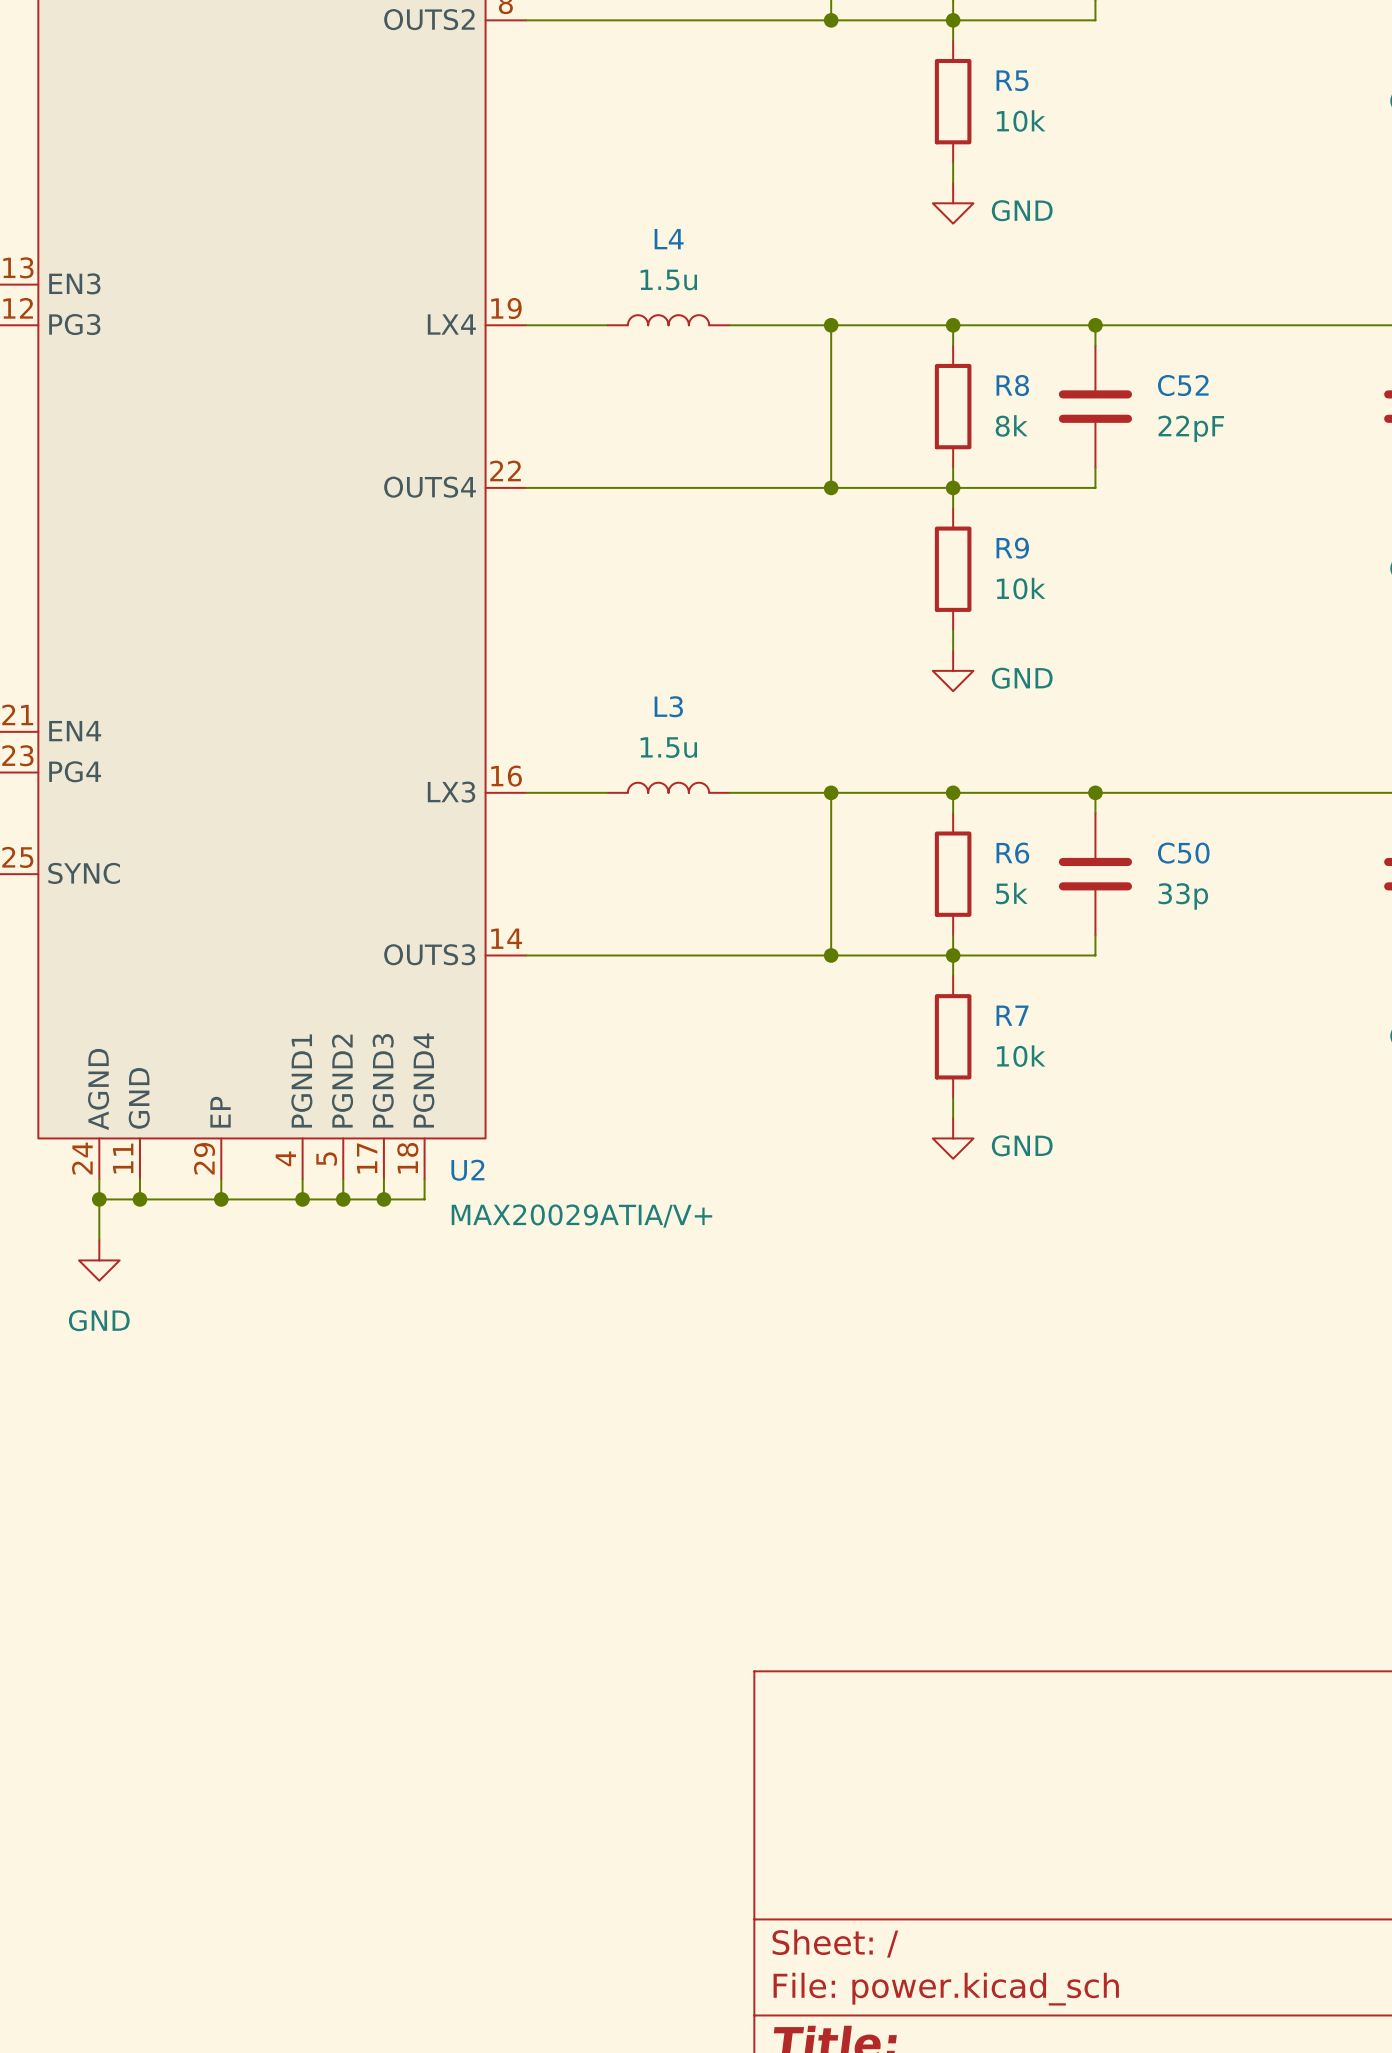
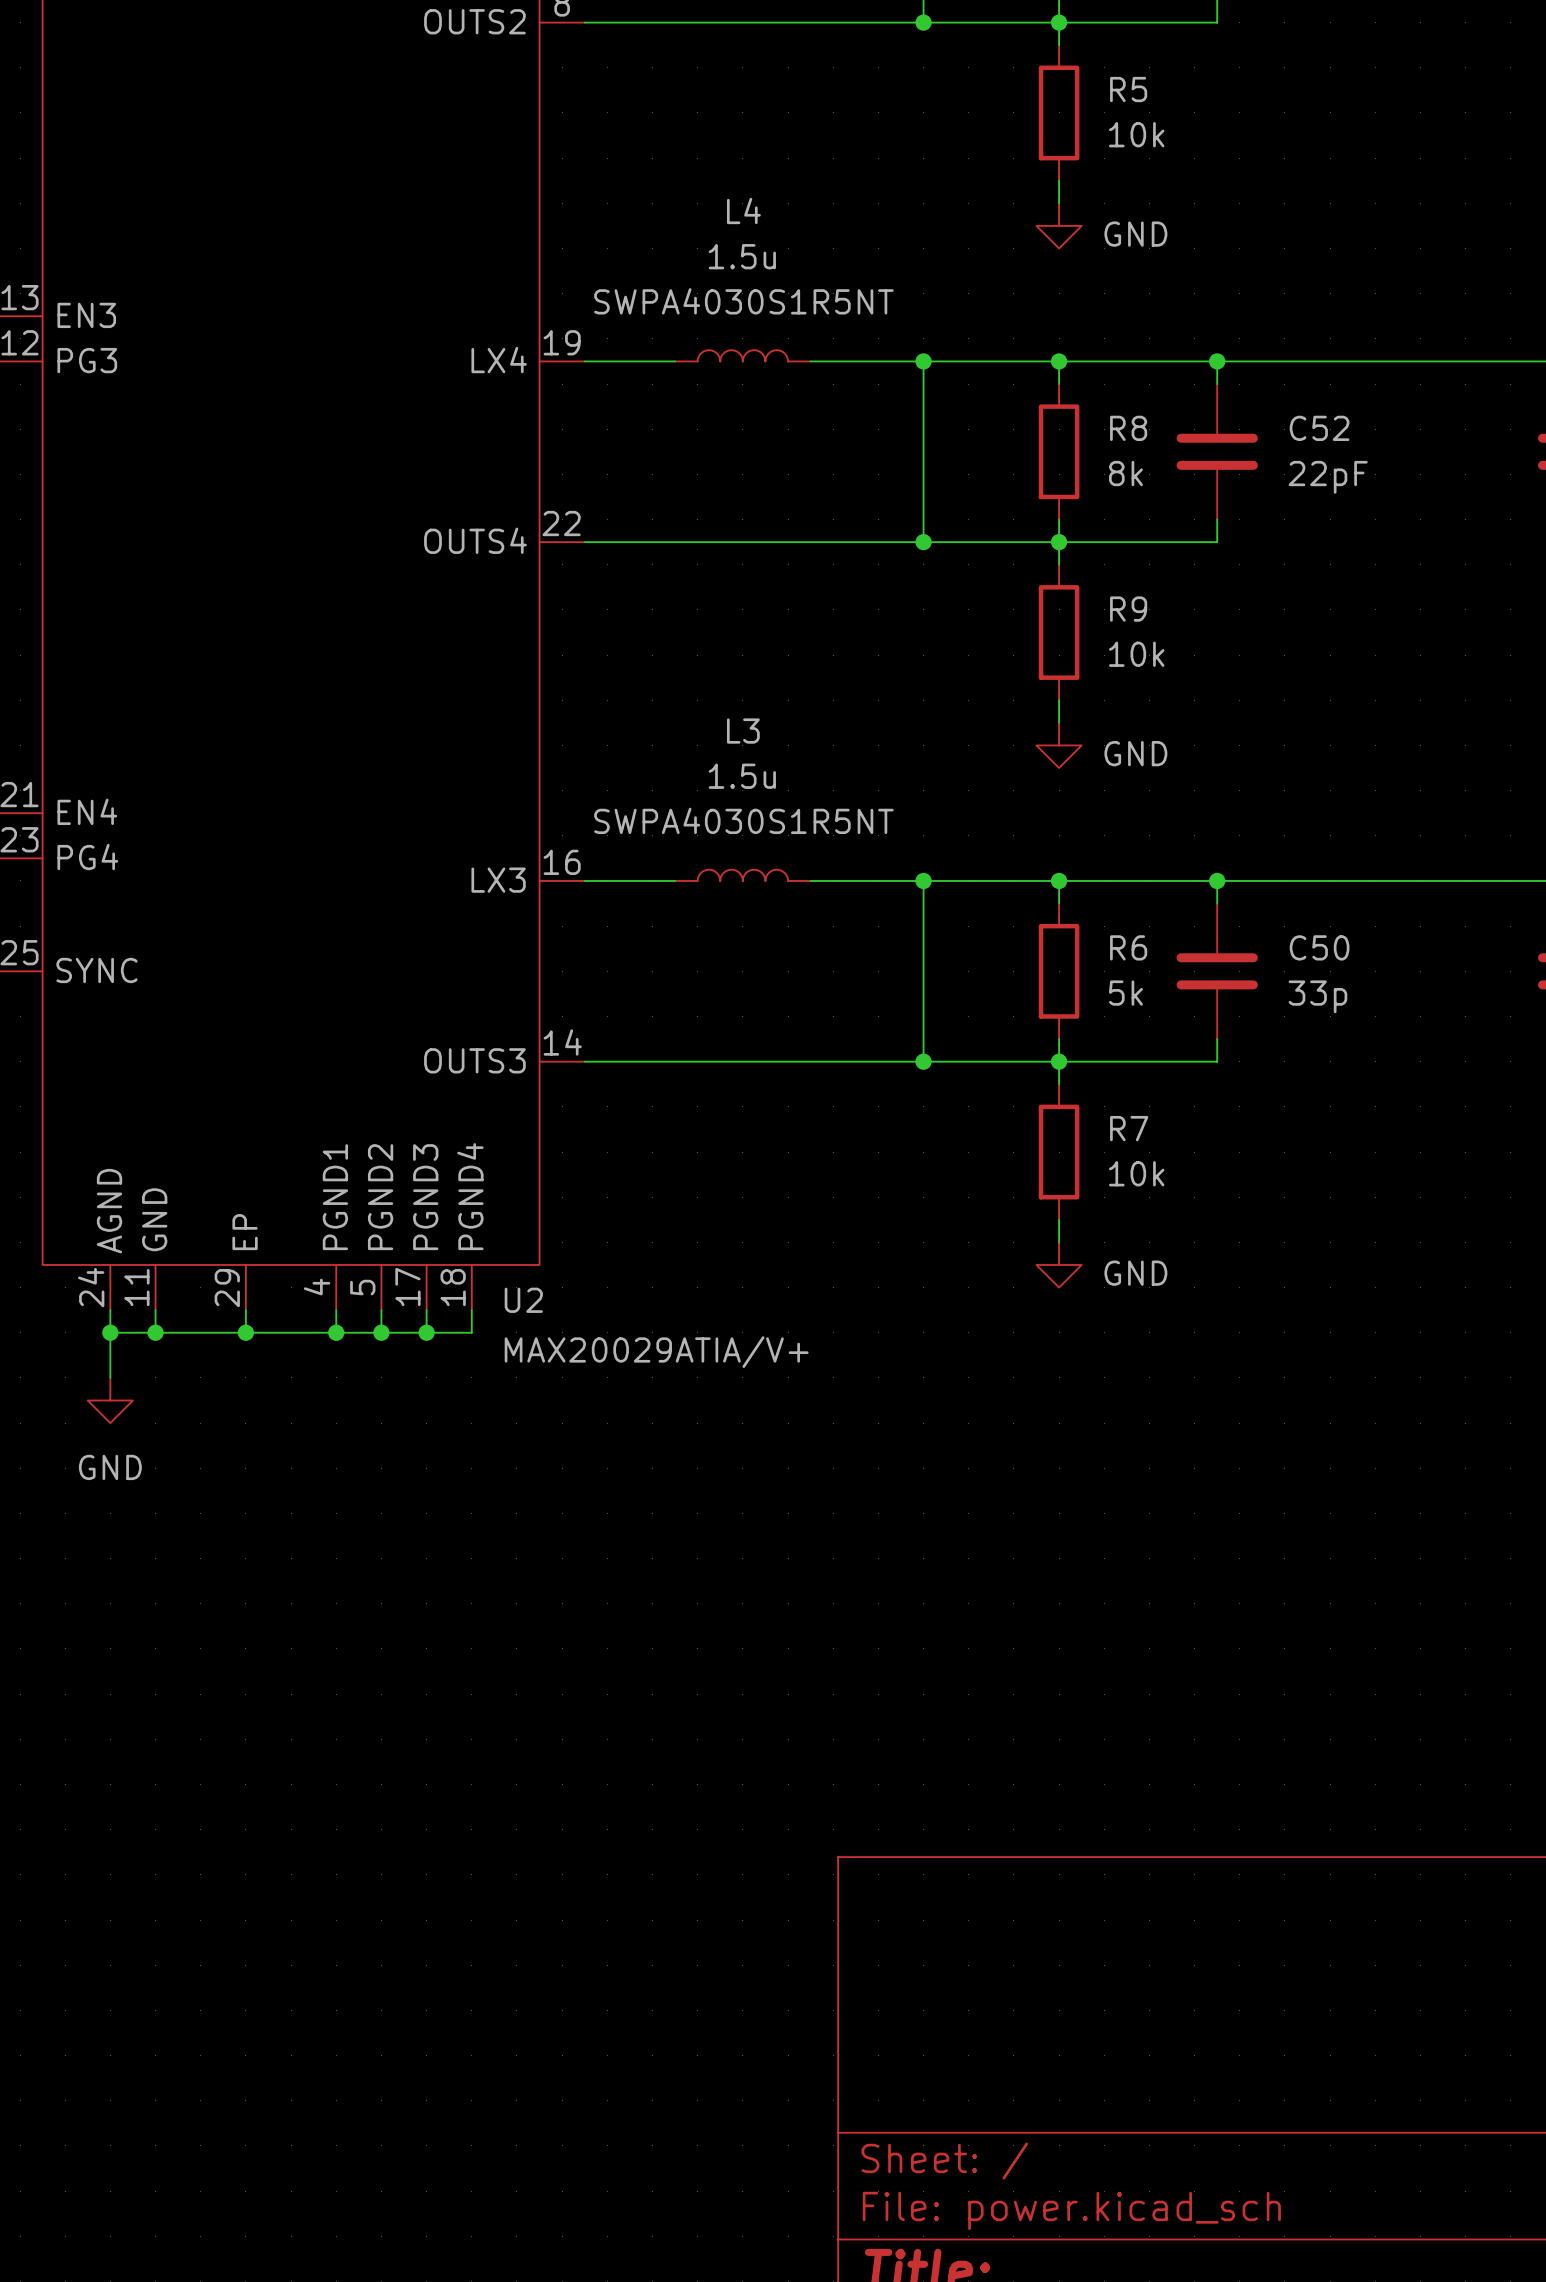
L4 name position: L4 (669, 239) -> L4 (743, 210)
L4 text: none -> SWPA4030S1R5NT (743, 301)
L4 value position: 1.5u (668, 279) -> 1.5u (742, 256)
L3 name position: L3 (668, 706) -> L3 (743, 731)
L3 text: none -> SWPA4030S1R5NT (743, 820)
L3 value position: 1.5u (668, 747) -> 1.5u (742, 776)

